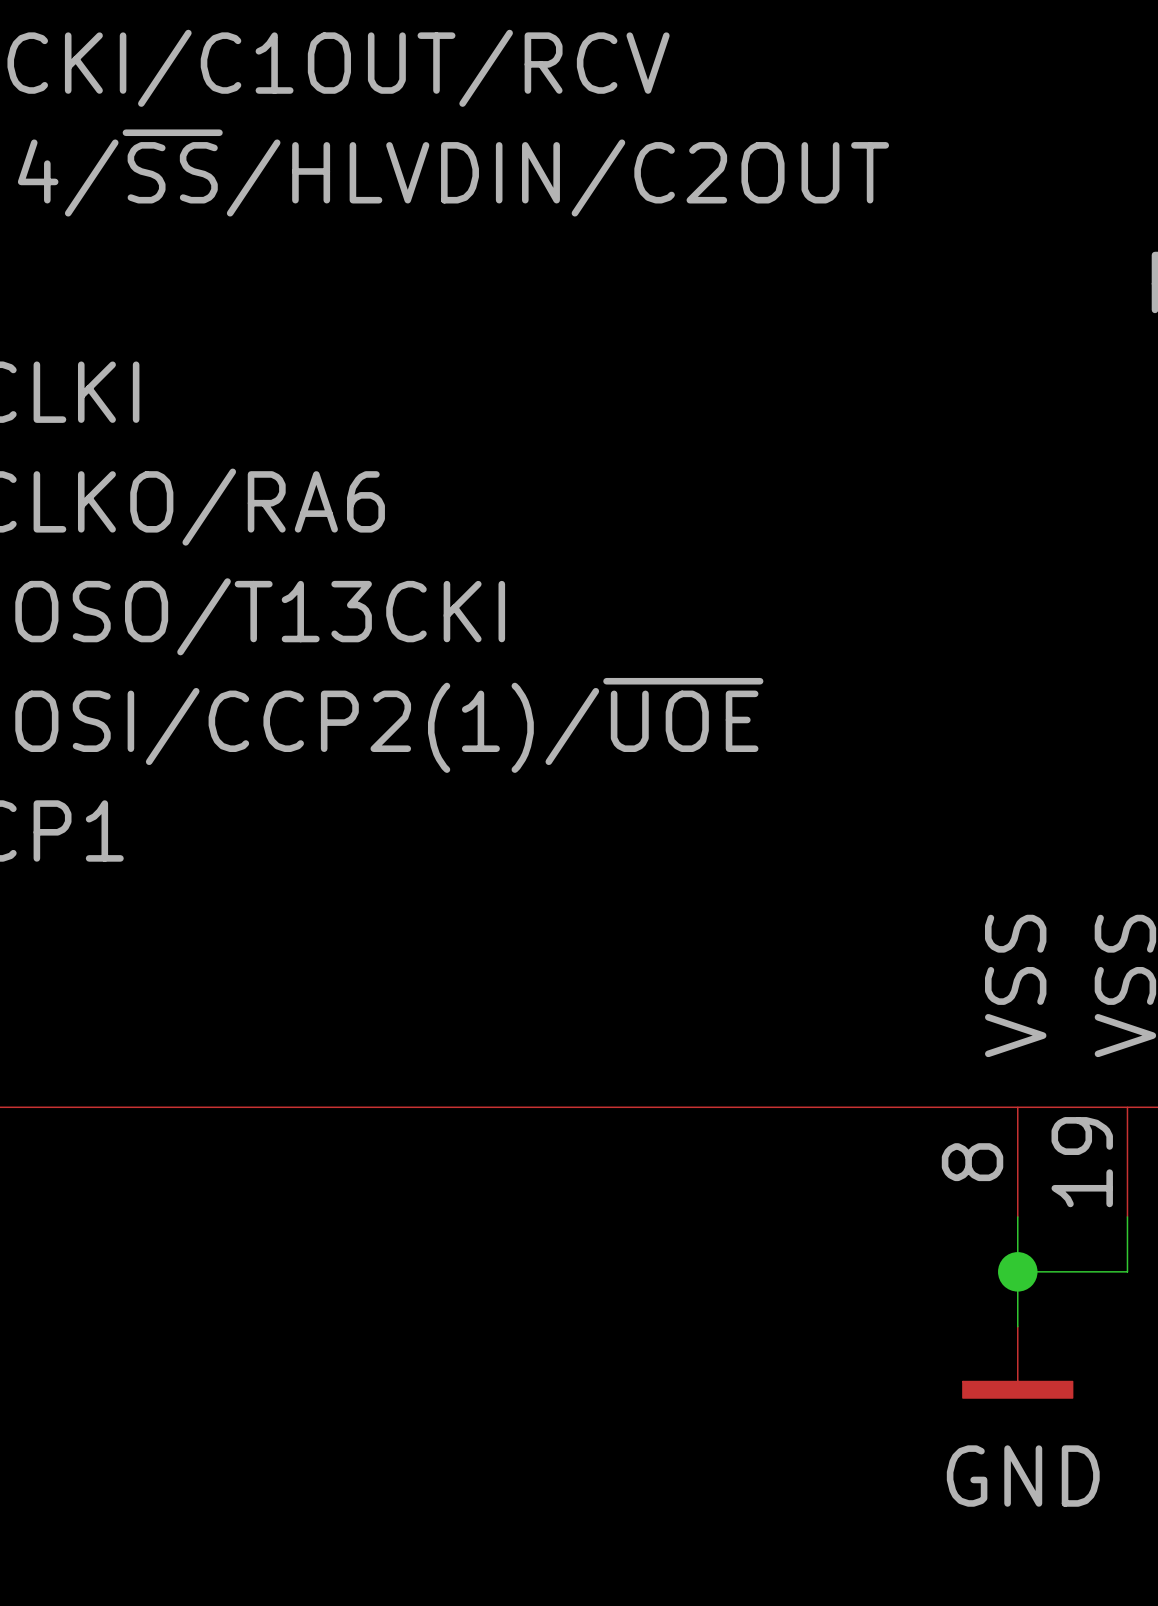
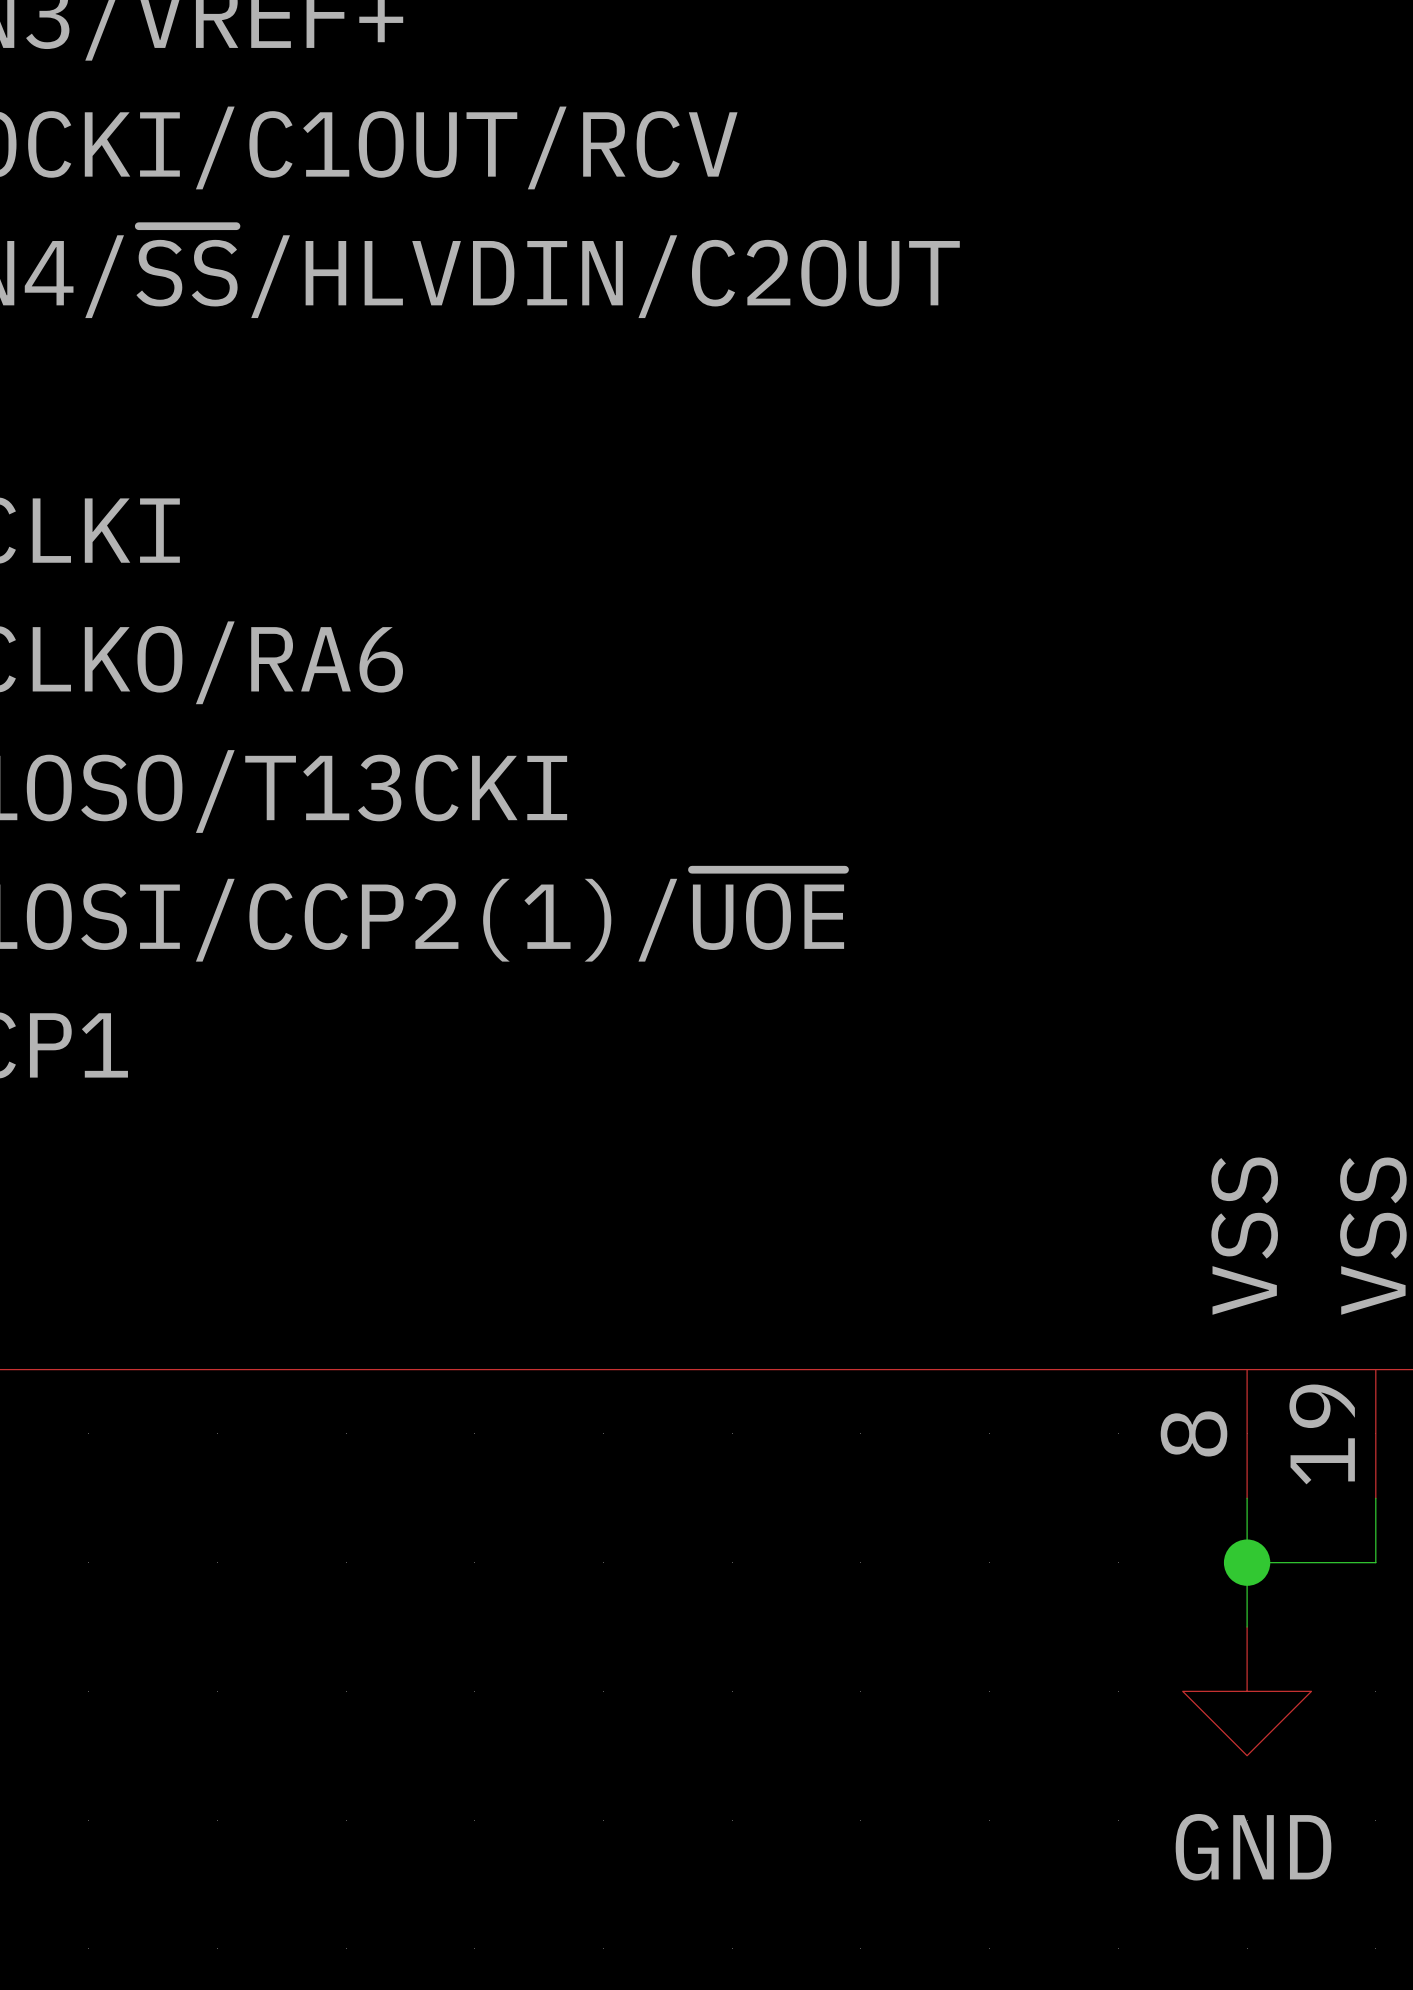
power symbol shape: [962, 1326, 1073, 1399] -> [1182, 1627, 1312, 1756]
power symbol text position: GND (1023, 1476) -> GND (1253, 1847)

